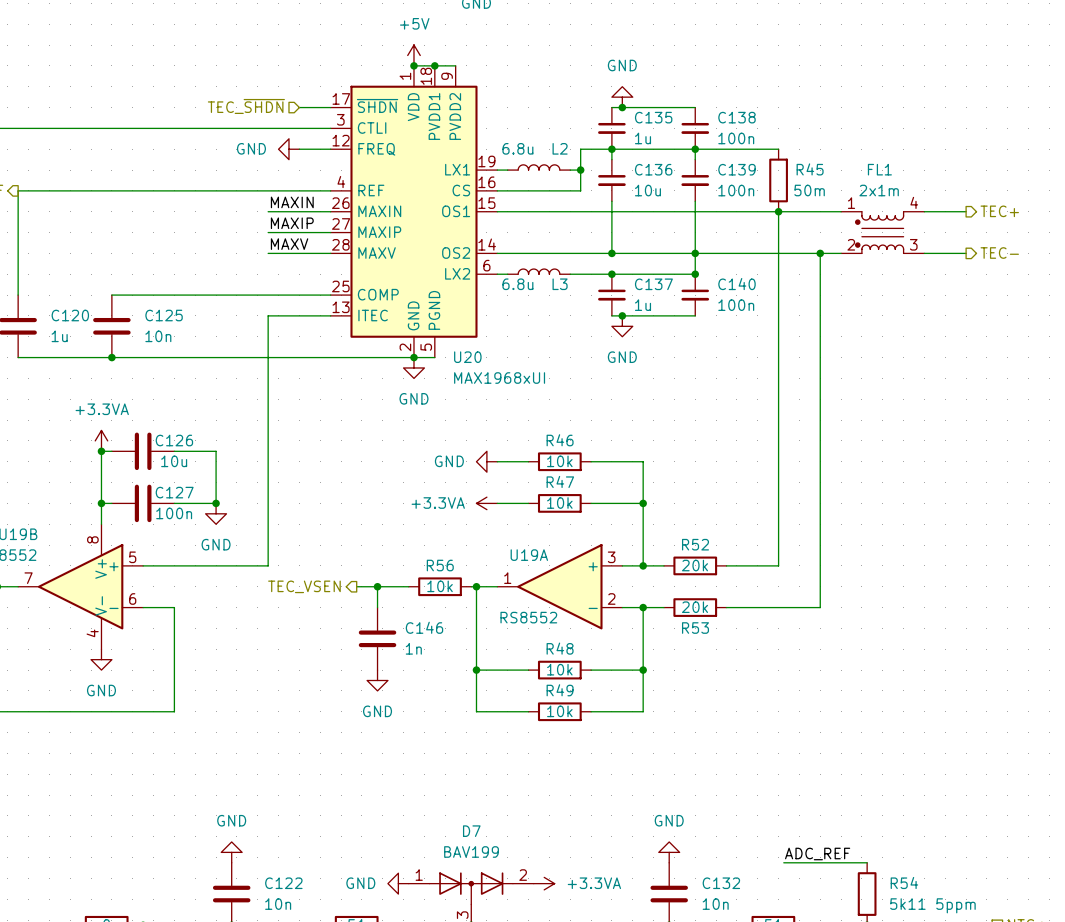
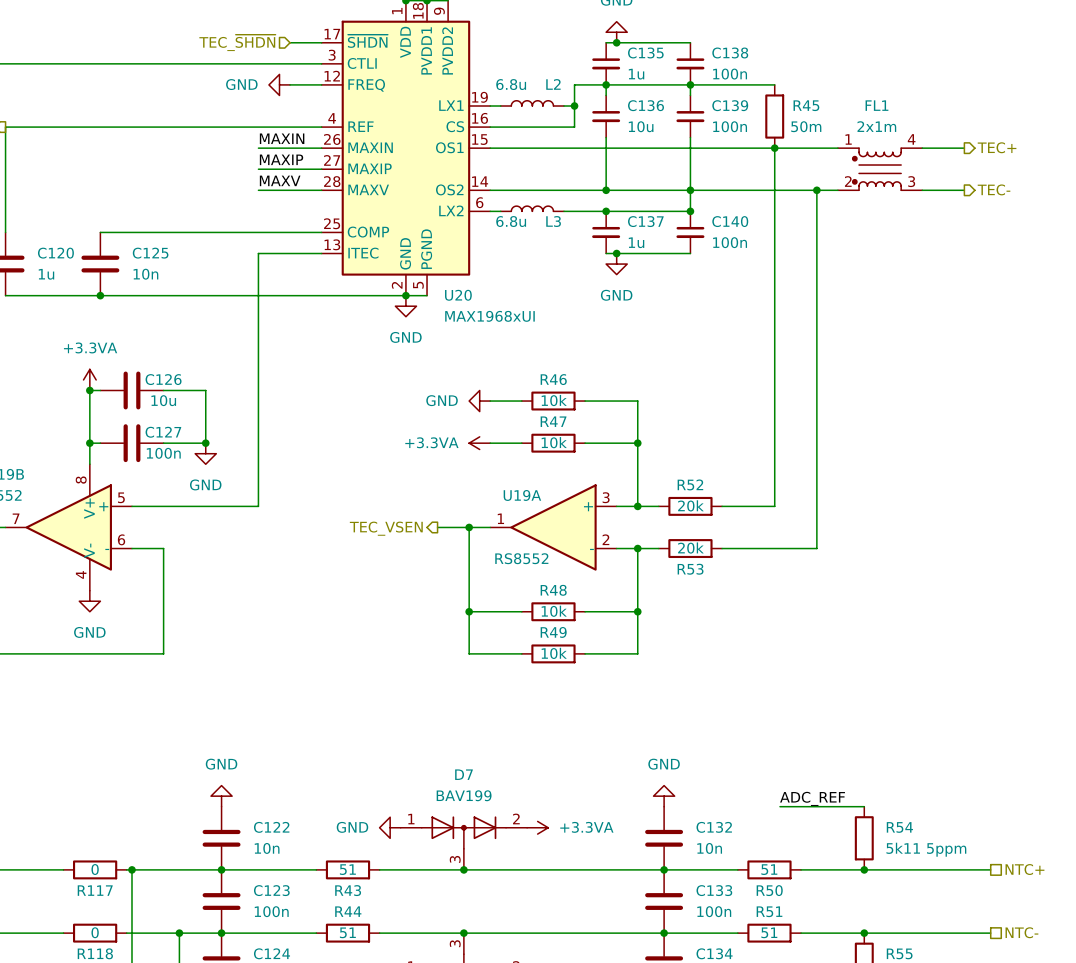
hierarchical label position: TEC_VSEN (304, 586) -> TEC_VSEN (386, 528)
wire: (356, 586) (408, 586) -> none
wire: (377, 586) (377, 607) -> none
junction: (377, 586) -> none
R56: 10k (440, 586) -> none
C146: 1n (377, 638) -> none
power symbol: GND (377, 680) -> none

